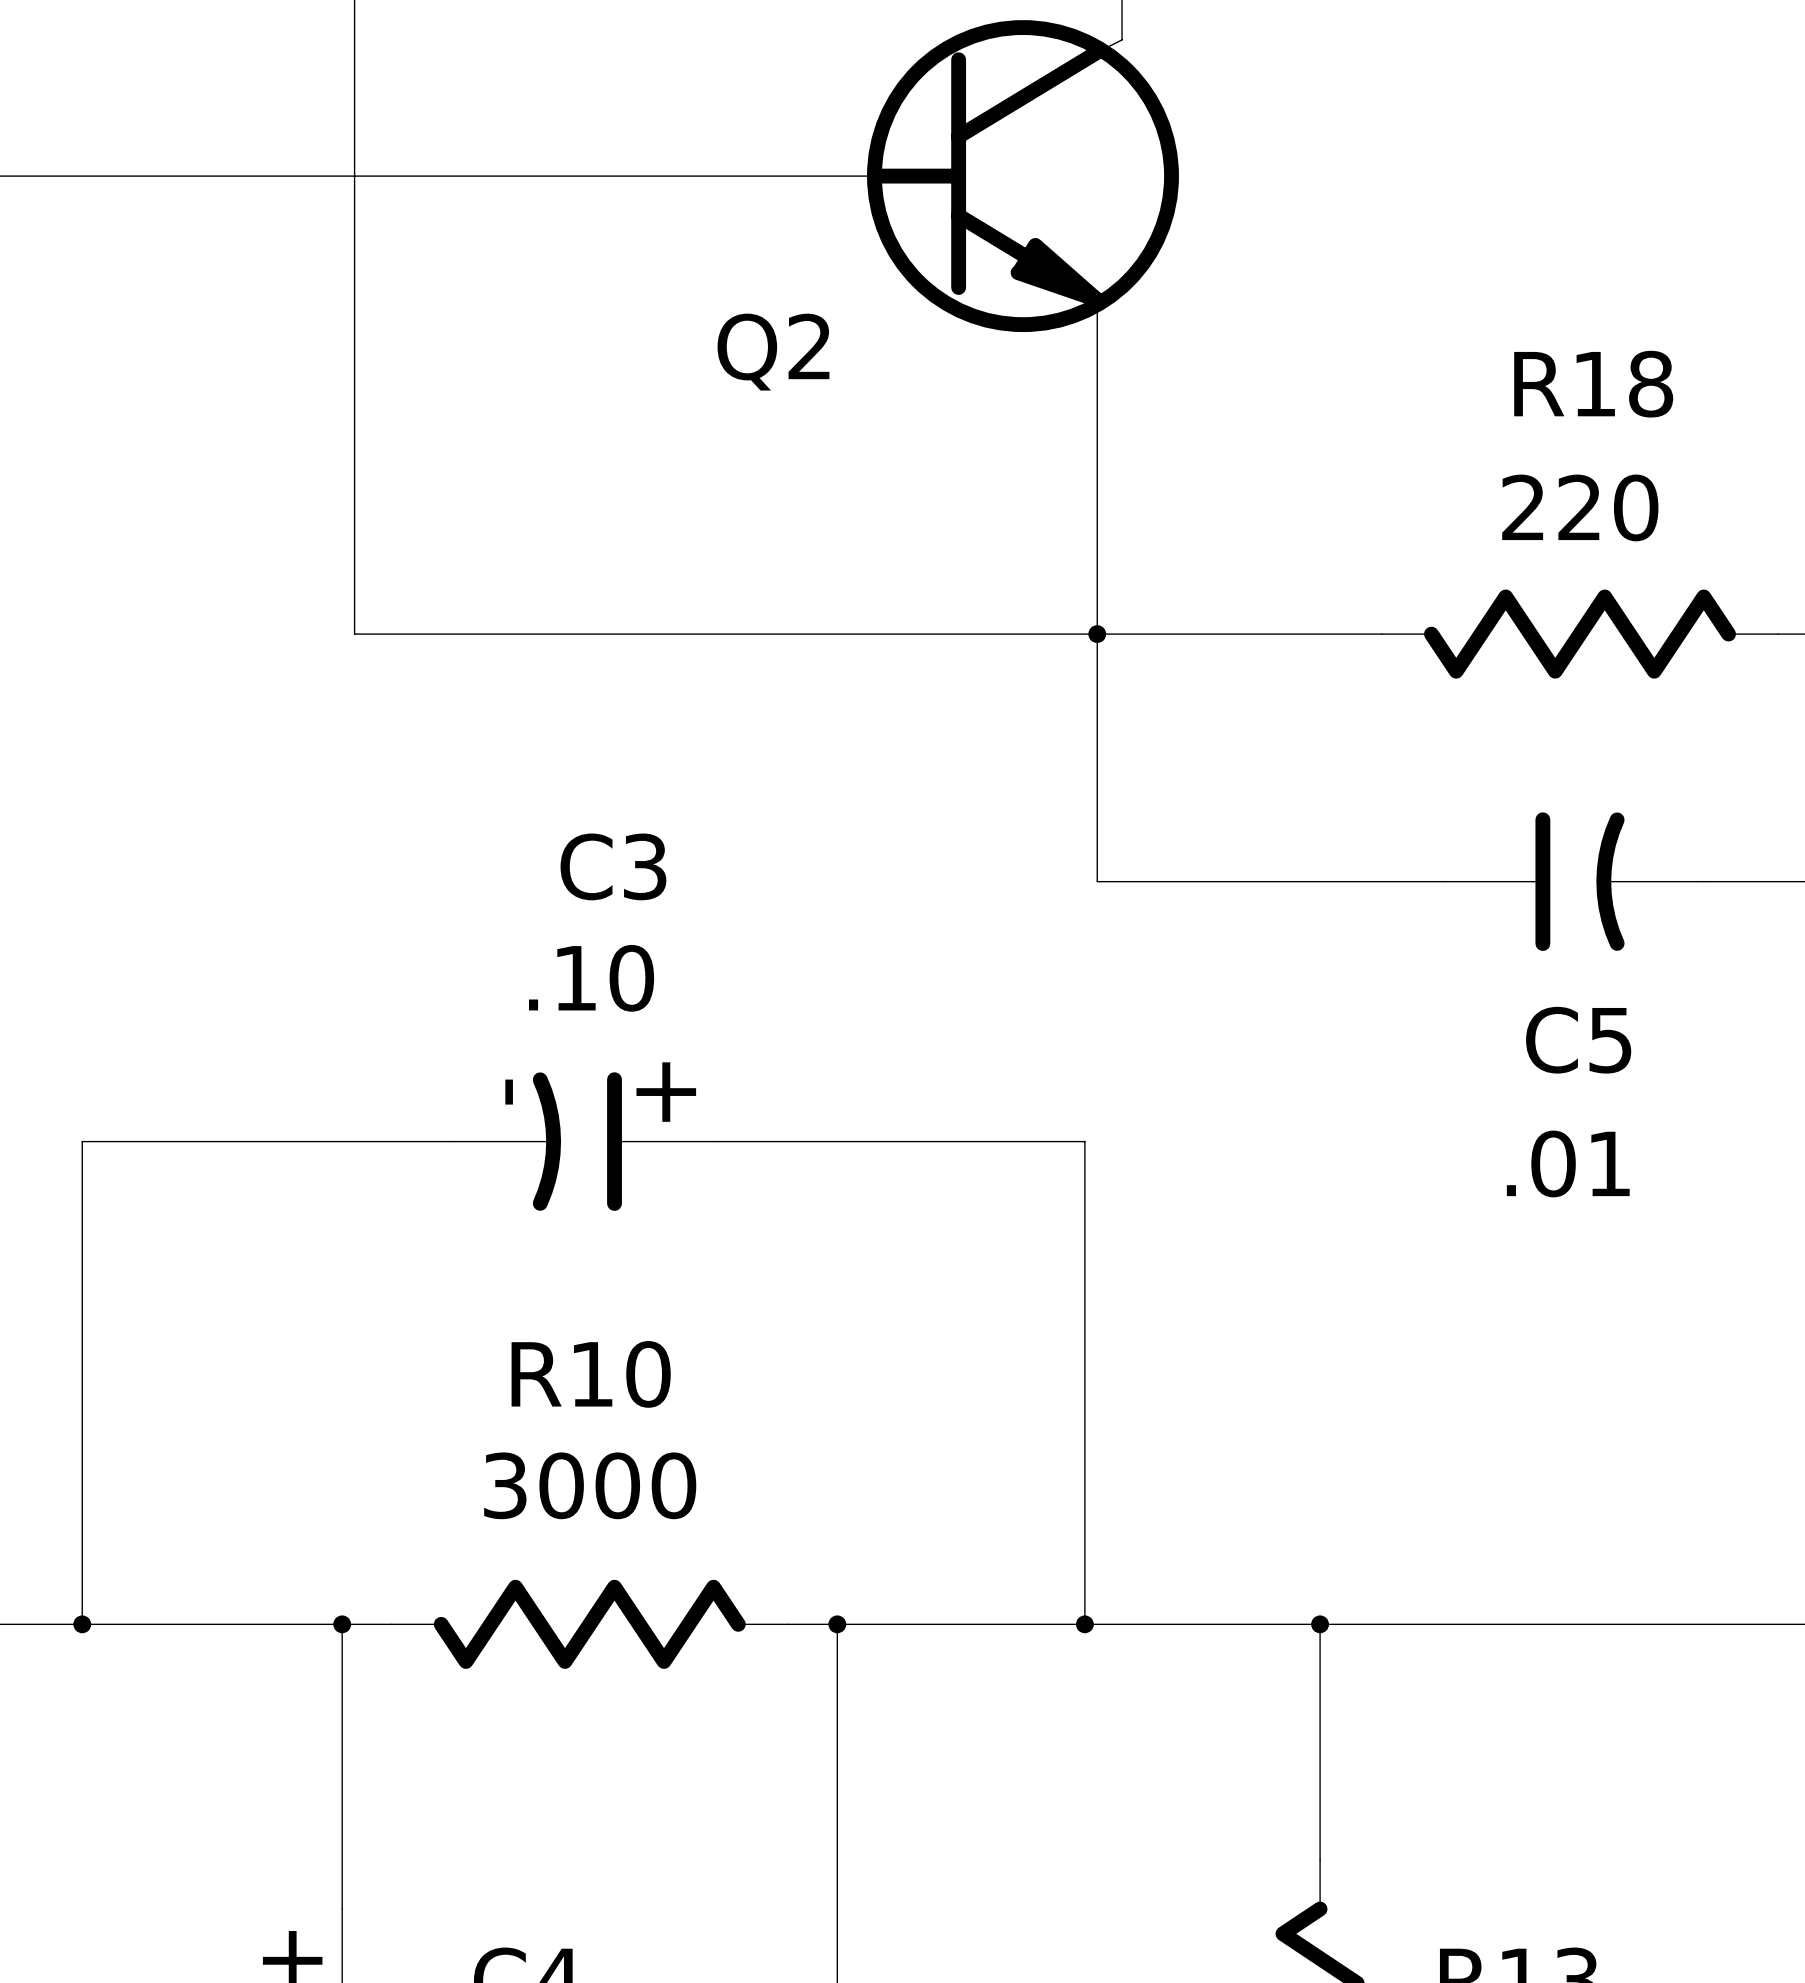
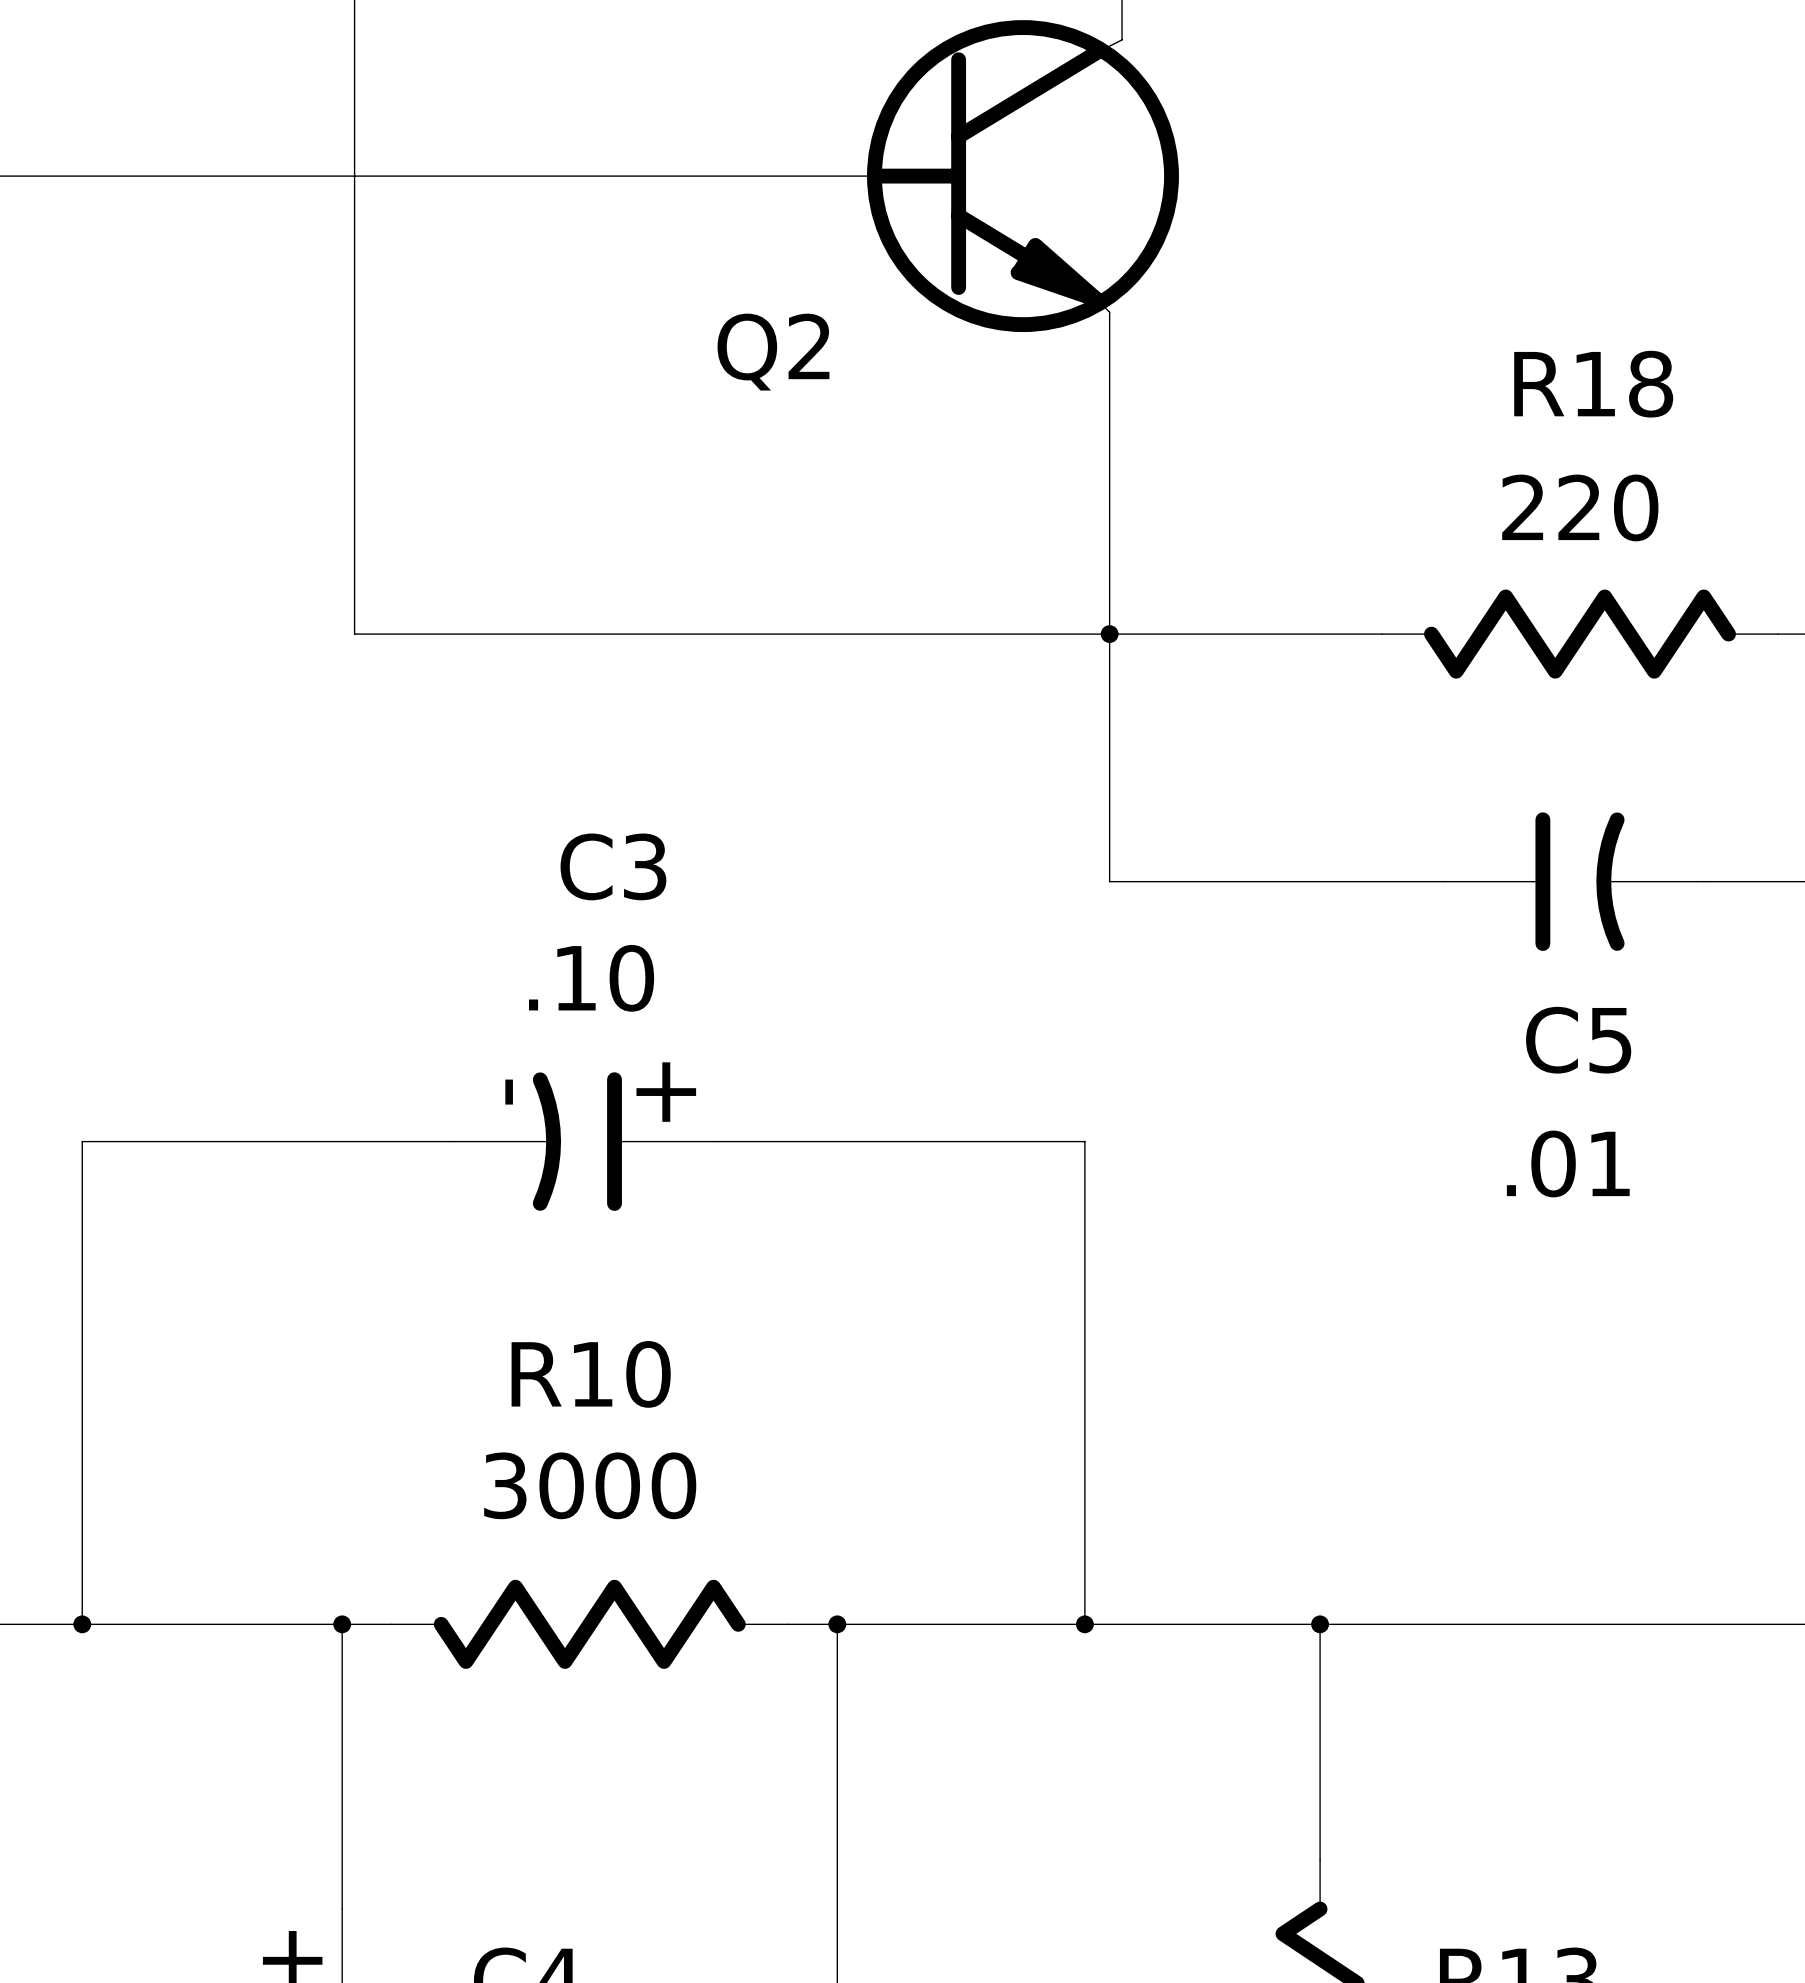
wire: (1097, 299) (1097, 881) (1109, 881) -> (1097, 299) (1109, 312) (1109, 881)
junction position: (1097, 634) -> (1109, 634)

